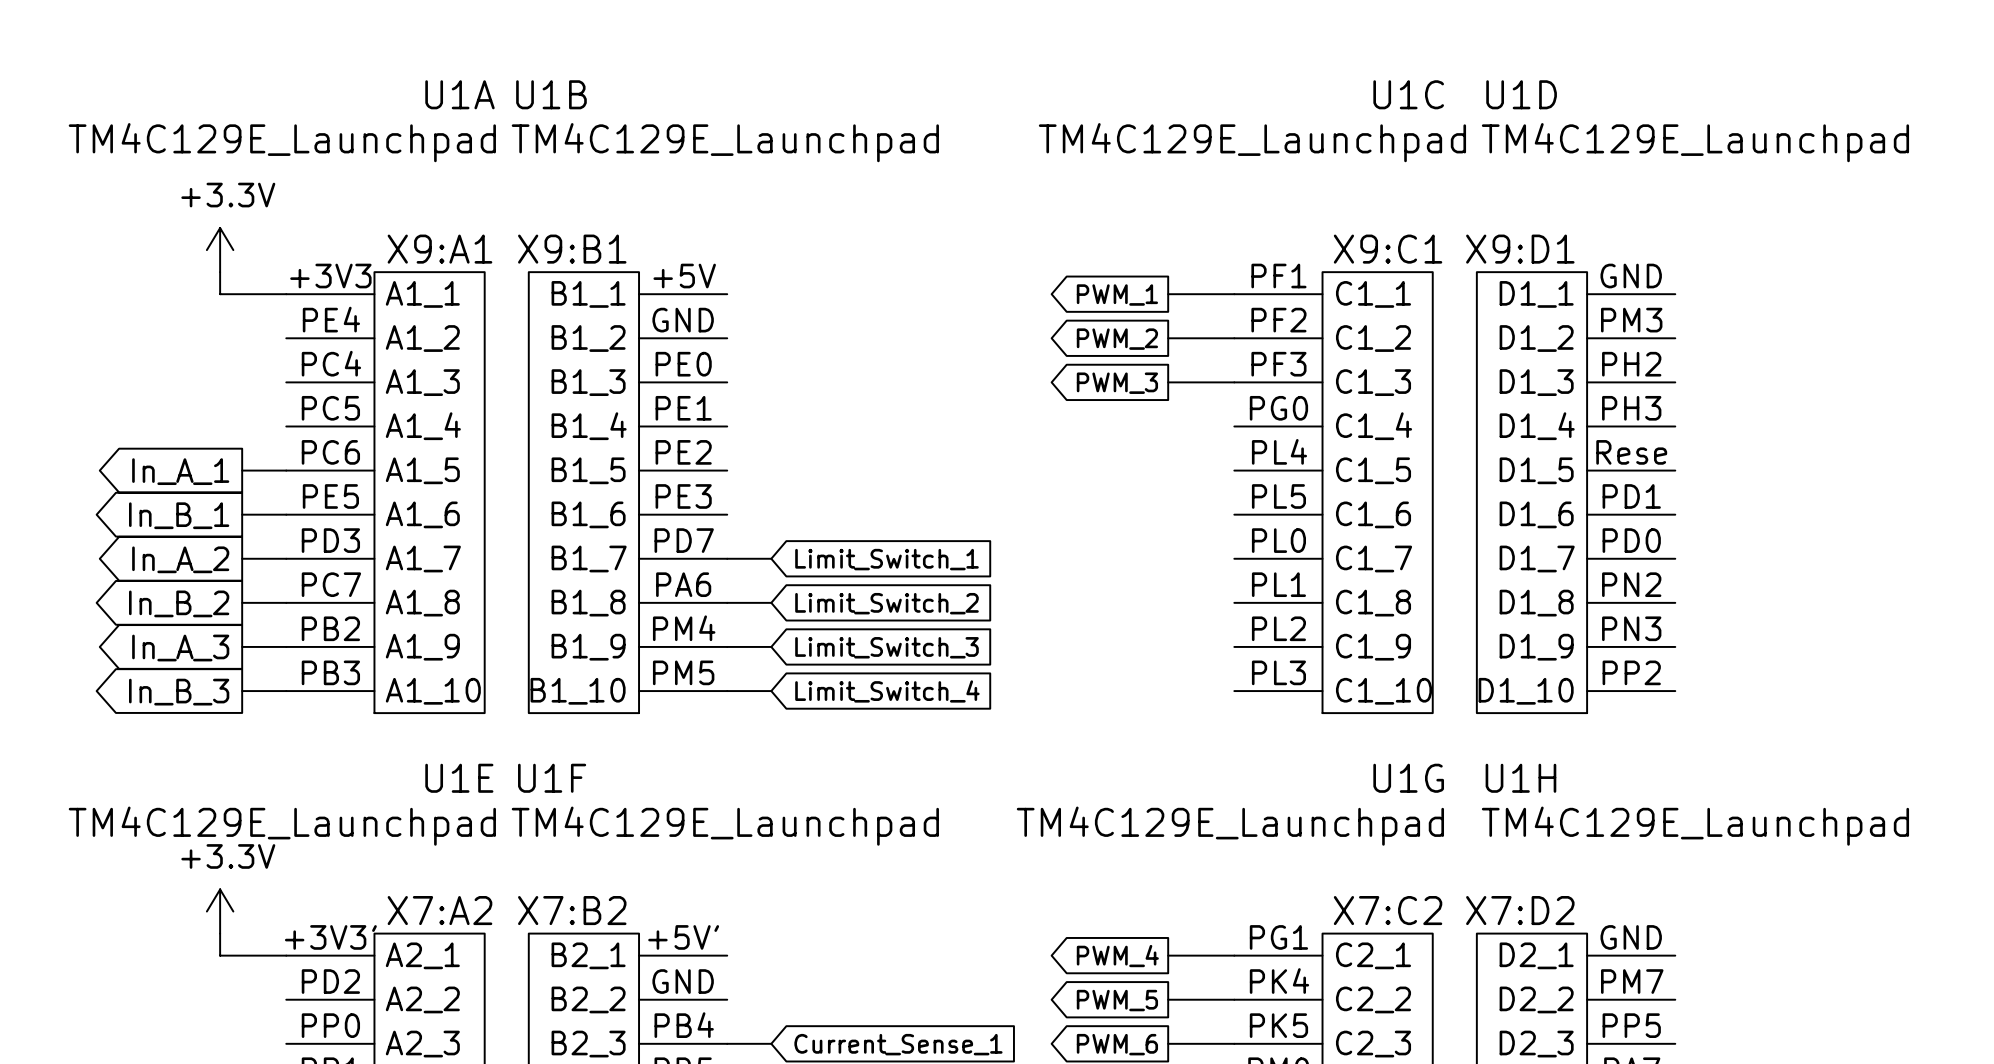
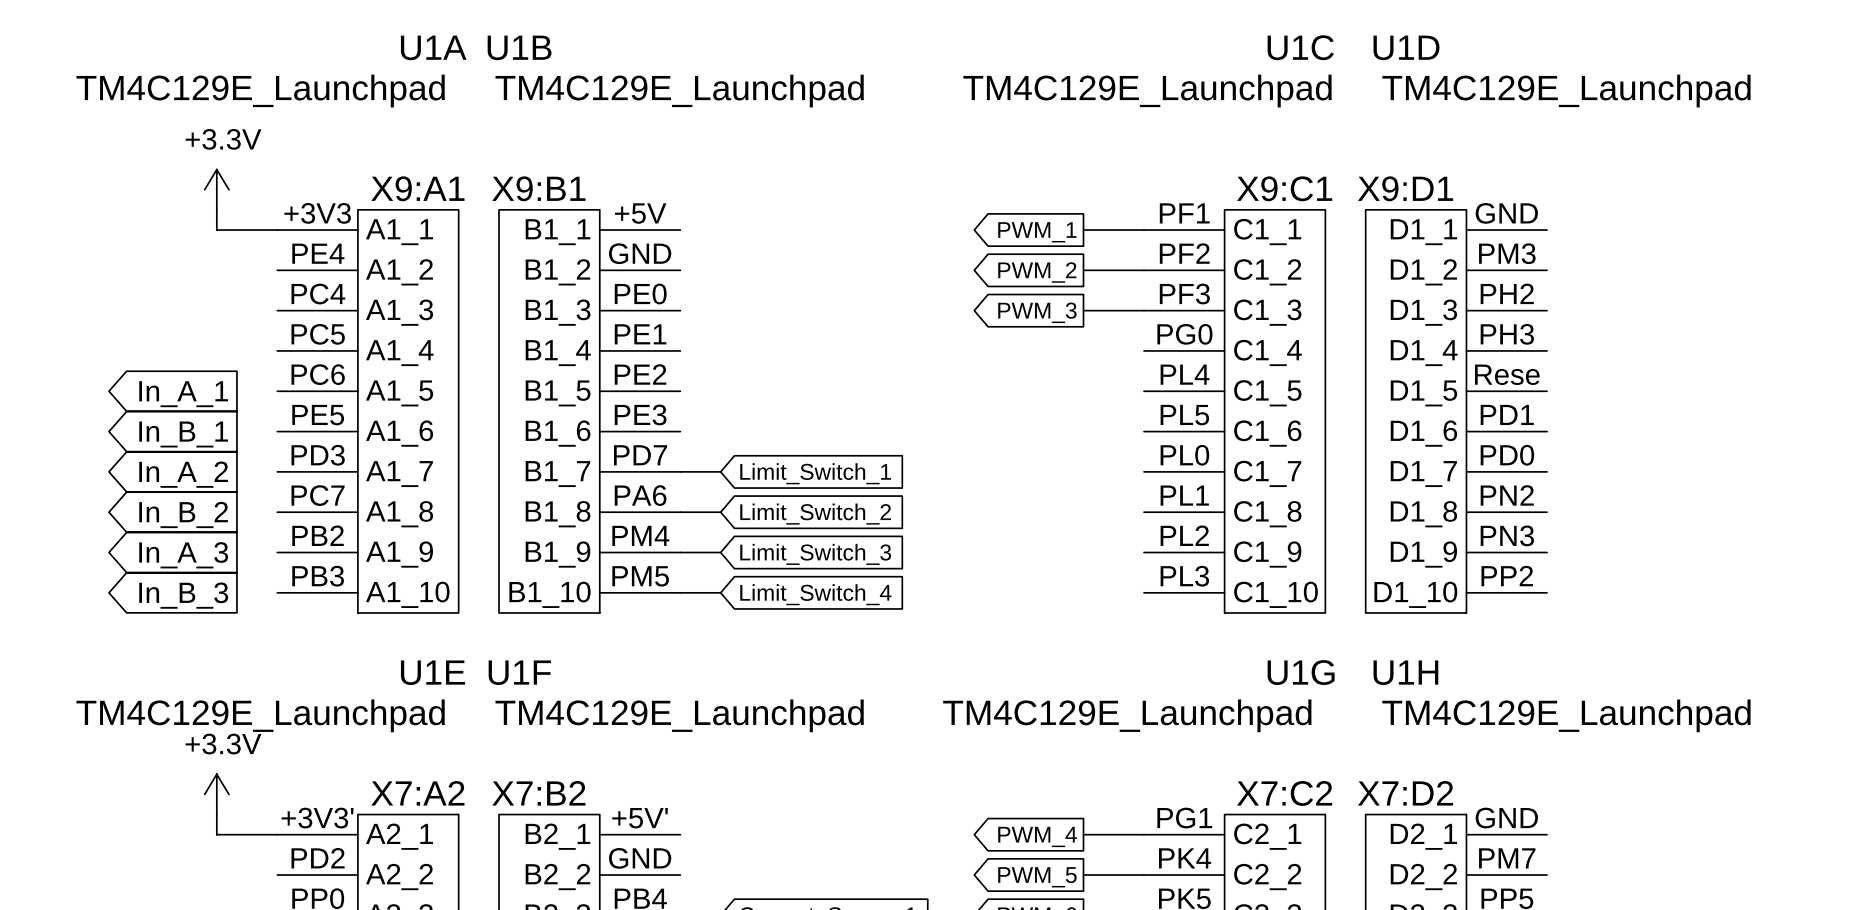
wire: (242, 470) (286, 470) -> none
wire: (242, 514) (286, 514) -> none
wire: (242, 558) (286, 558) -> none
wire: (242, 602) (286, 602) -> none
wire: (242, 646) (286, 646) -> none
wire: (242, 691) (286, 691) -> none

